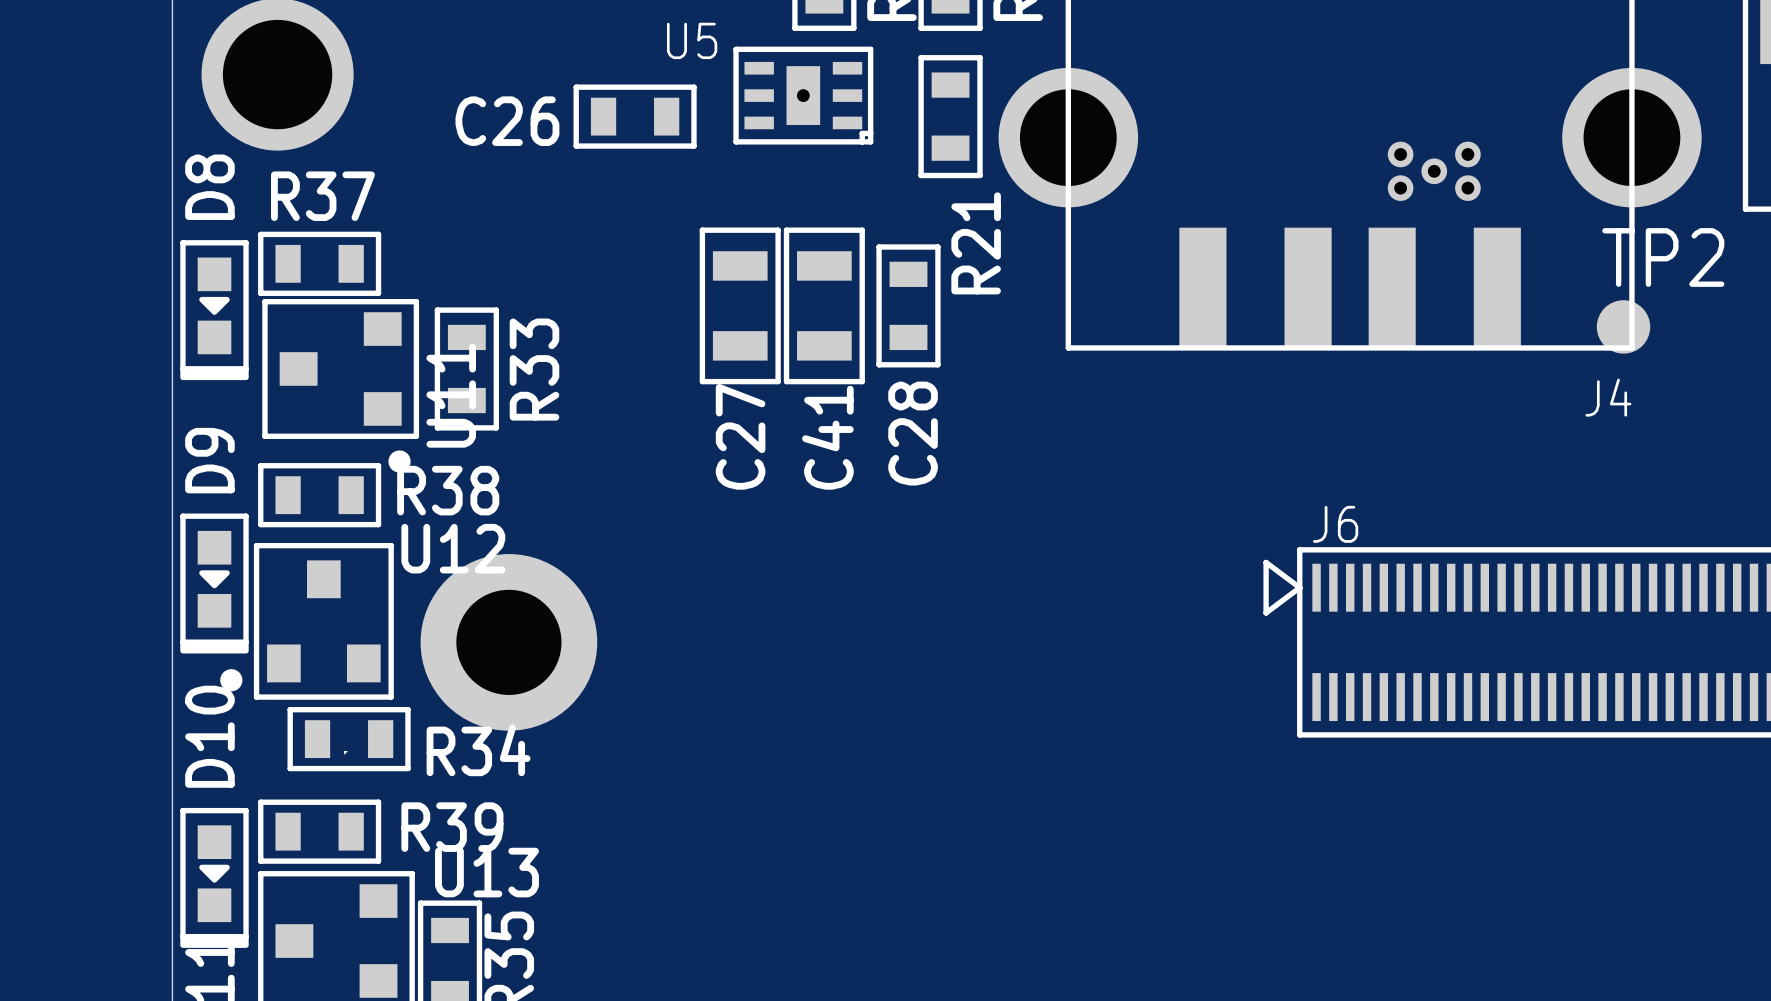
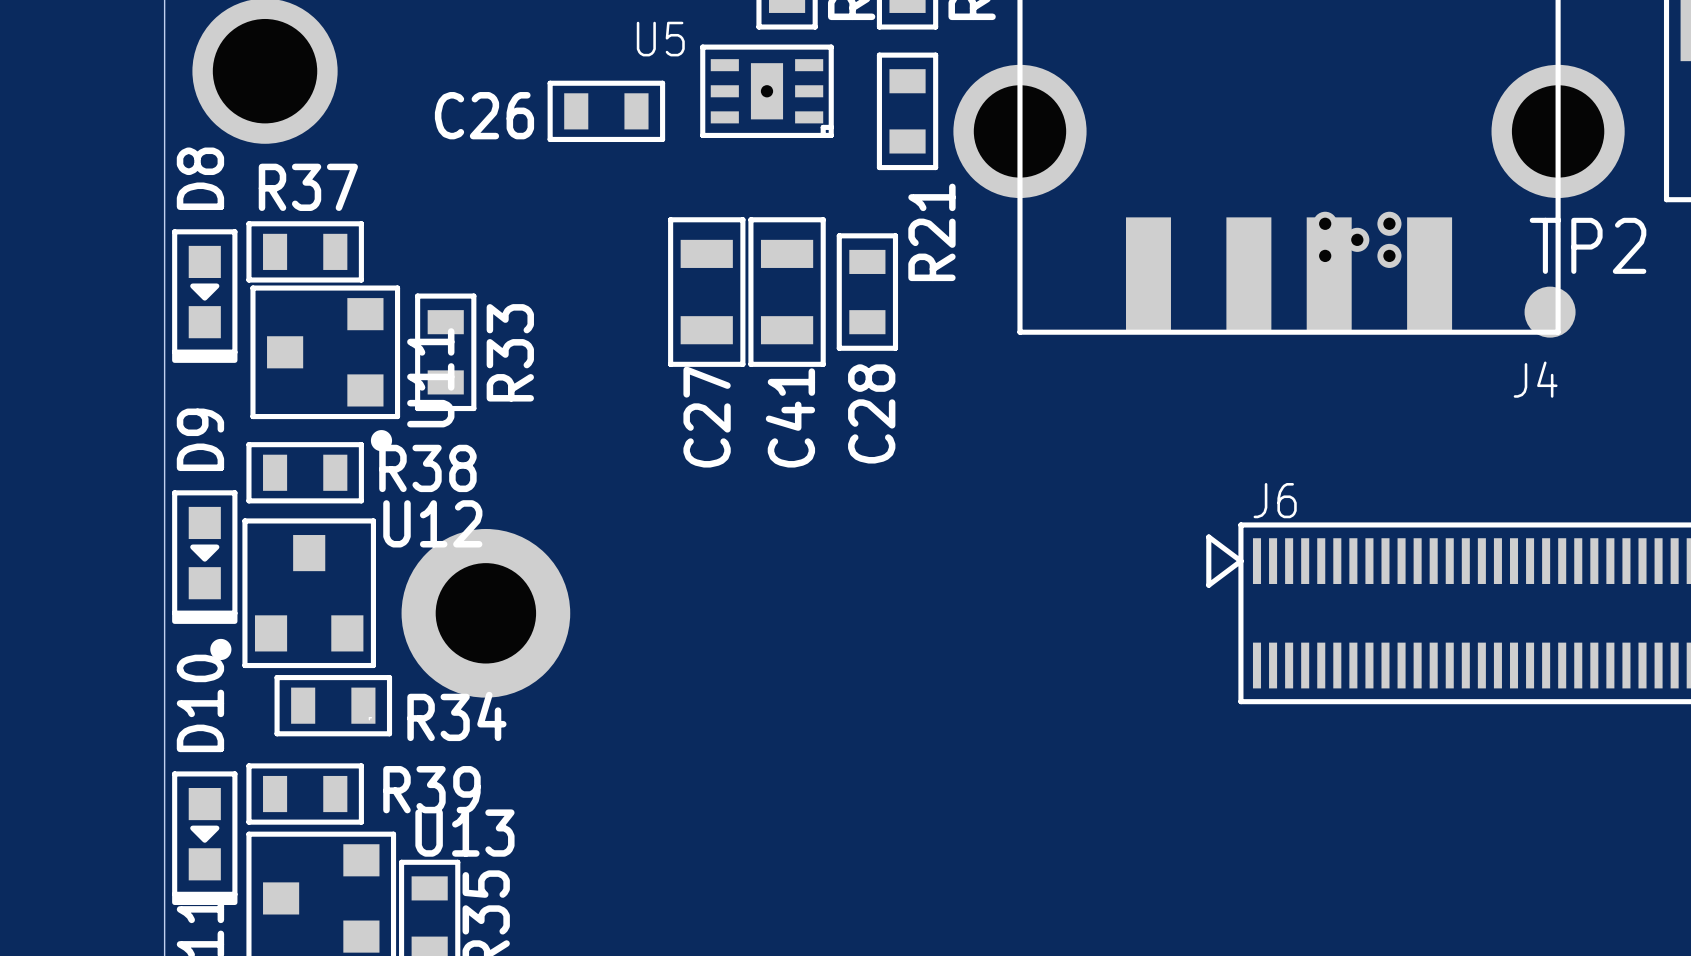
part position: (1434, 171) -> (1357, 239)
part position: (345, 752) -> (370, 718)

